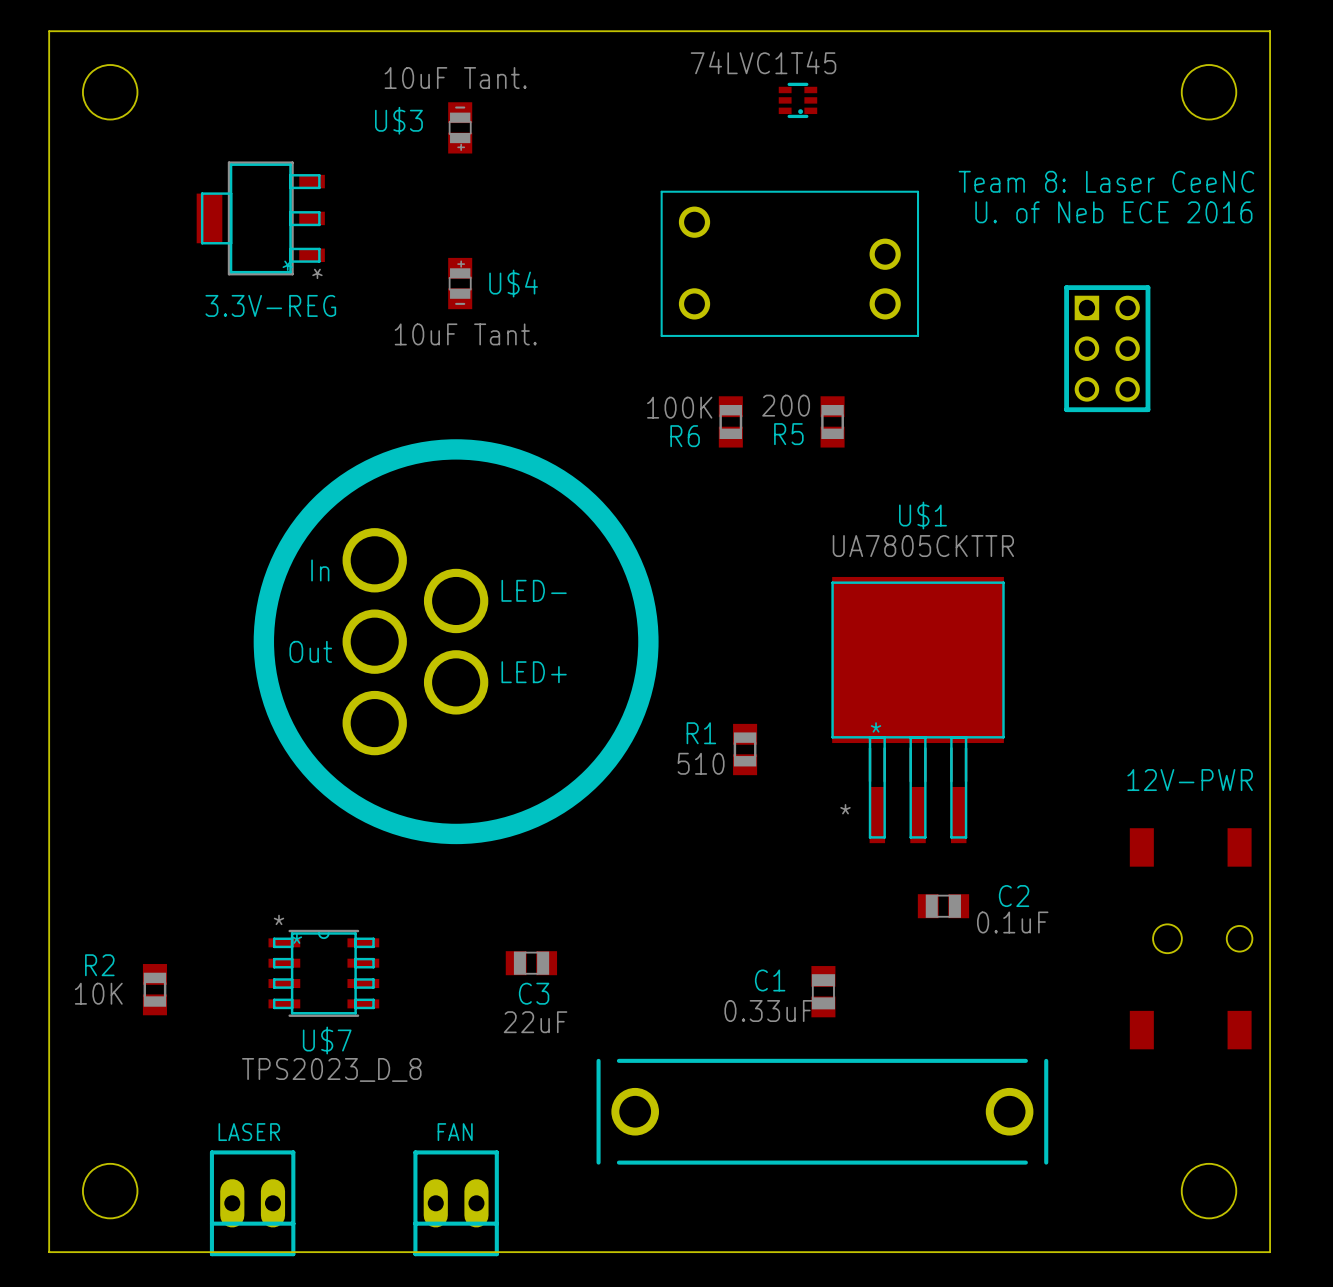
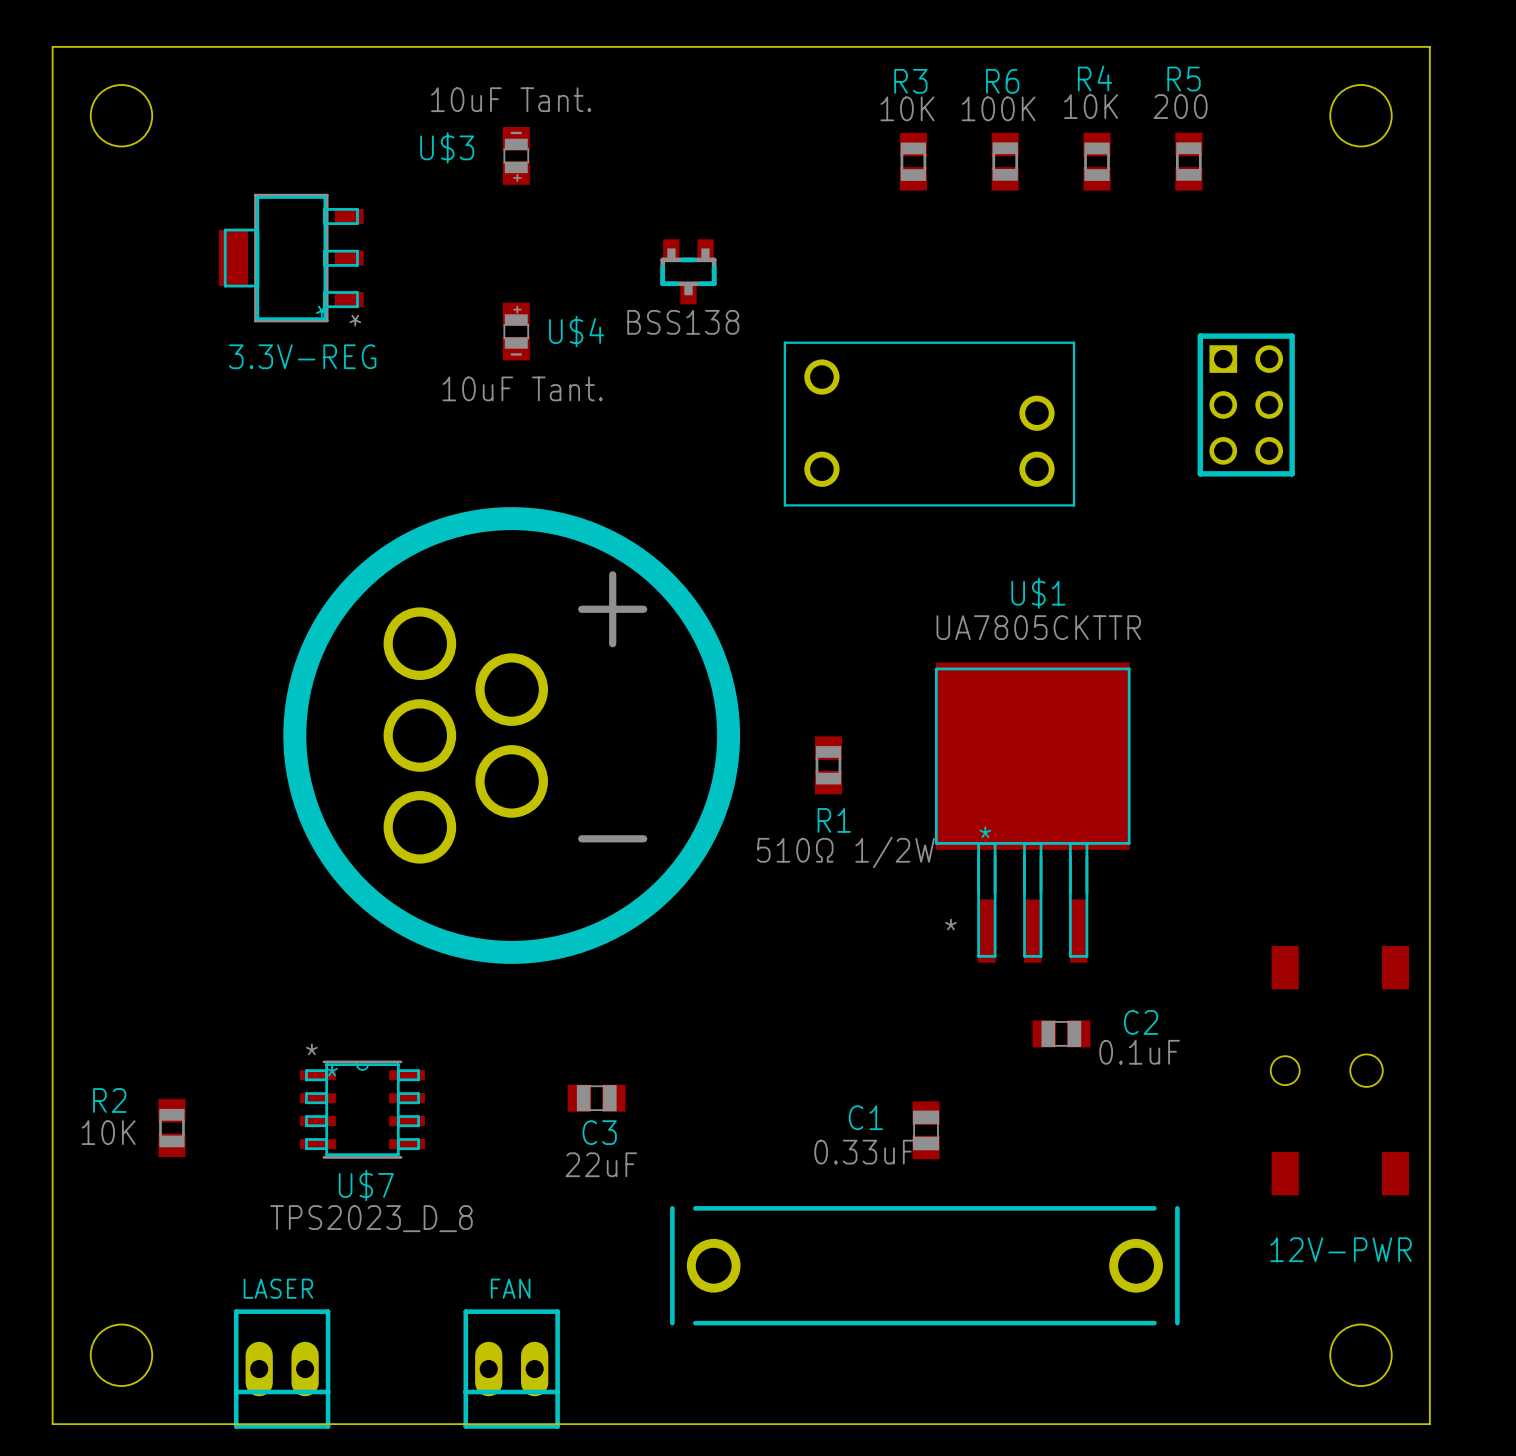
part: 74LVC1T45 (797, 100) -> none
R3: none -> 10K (913, 161)
R4: none -> 10K (1097, 161)
text: Team 8: Laser CeeNC (1106, 181) -> none
text: U. of Neb ECE 2016 (1113, 212) -> none
part: none -> BSS138 (688, 271)
part position: (789, 263) -> (929, 424)
R5 value position: 200 (786, 405) -> 200 (1180, 106)
R6 value position: 100K (679, 407) -> 100K (998, 108)
R6 position: (730, 421) -> (1005, 161)
R5 position: (832, 421) -> (1188, 161)
R5 name position: R5 (788, 434) -> R5 (1184, 79)
R6 name position: R6 (685, 436) -> R6 (1002, 81)
part text: none -> + (612, 609)
part text: In (320, 570) -> none
part text: LED- (534, 590) -> none
part text: Out (310, 651) -> none
part text: LED+ (534, 672) -> none
part text: none -> - (612, 838)
R1 name position: R1 (701, 733) -> R1 (834, 820)
R1 position: (745, 749) -> (828, 765)
R1 value: 510 (701, 763) -> 510Ω 1/2W (845, 852)
12V-PWR rotation: 0° (1191, 938) -> 180° (1339, 1070)

